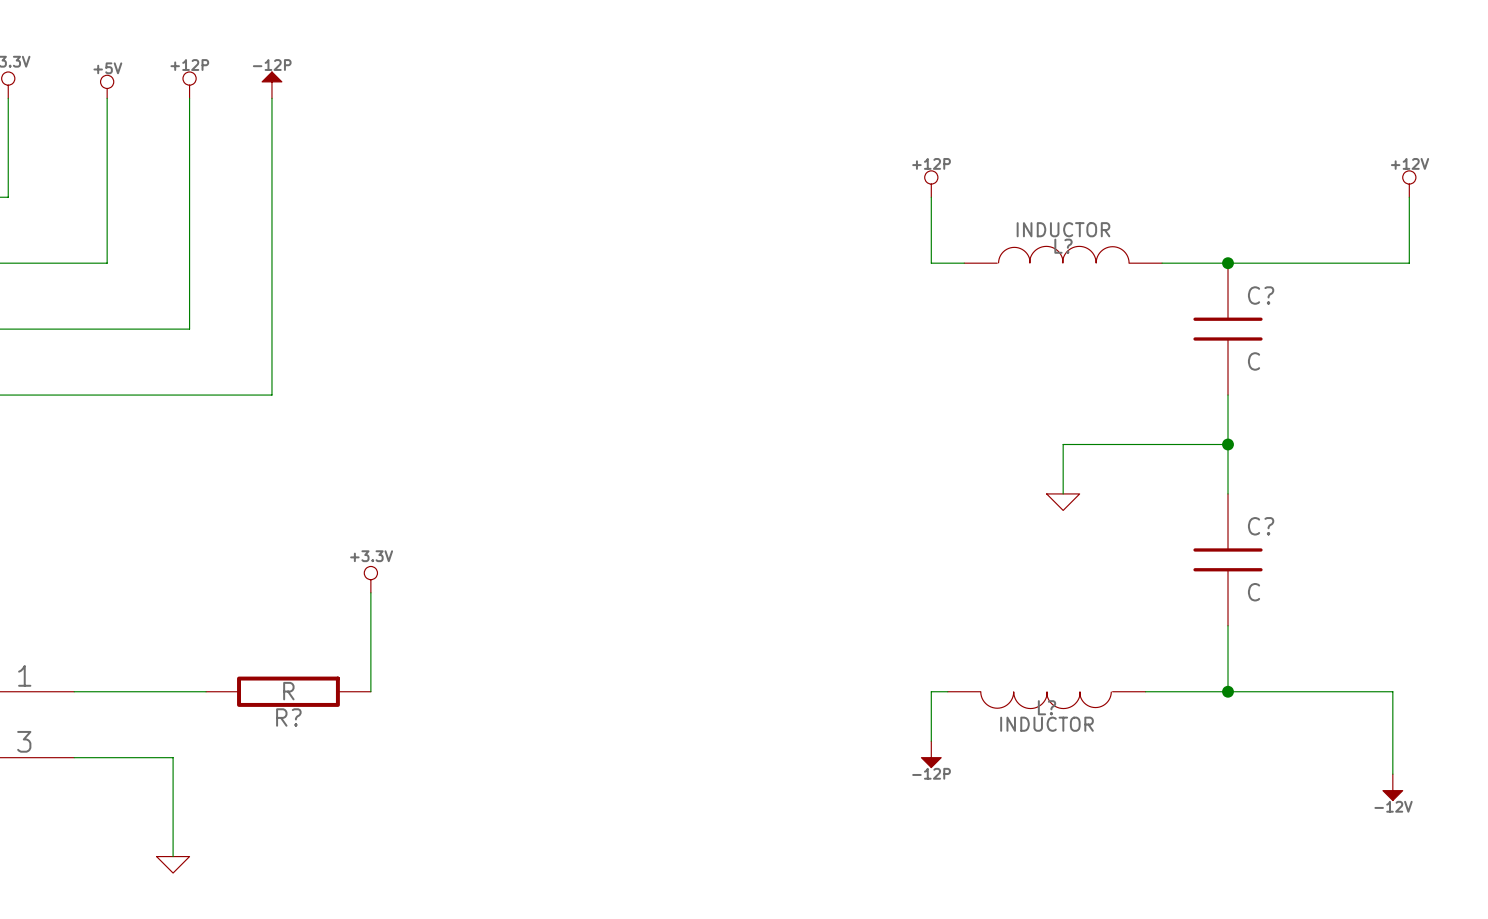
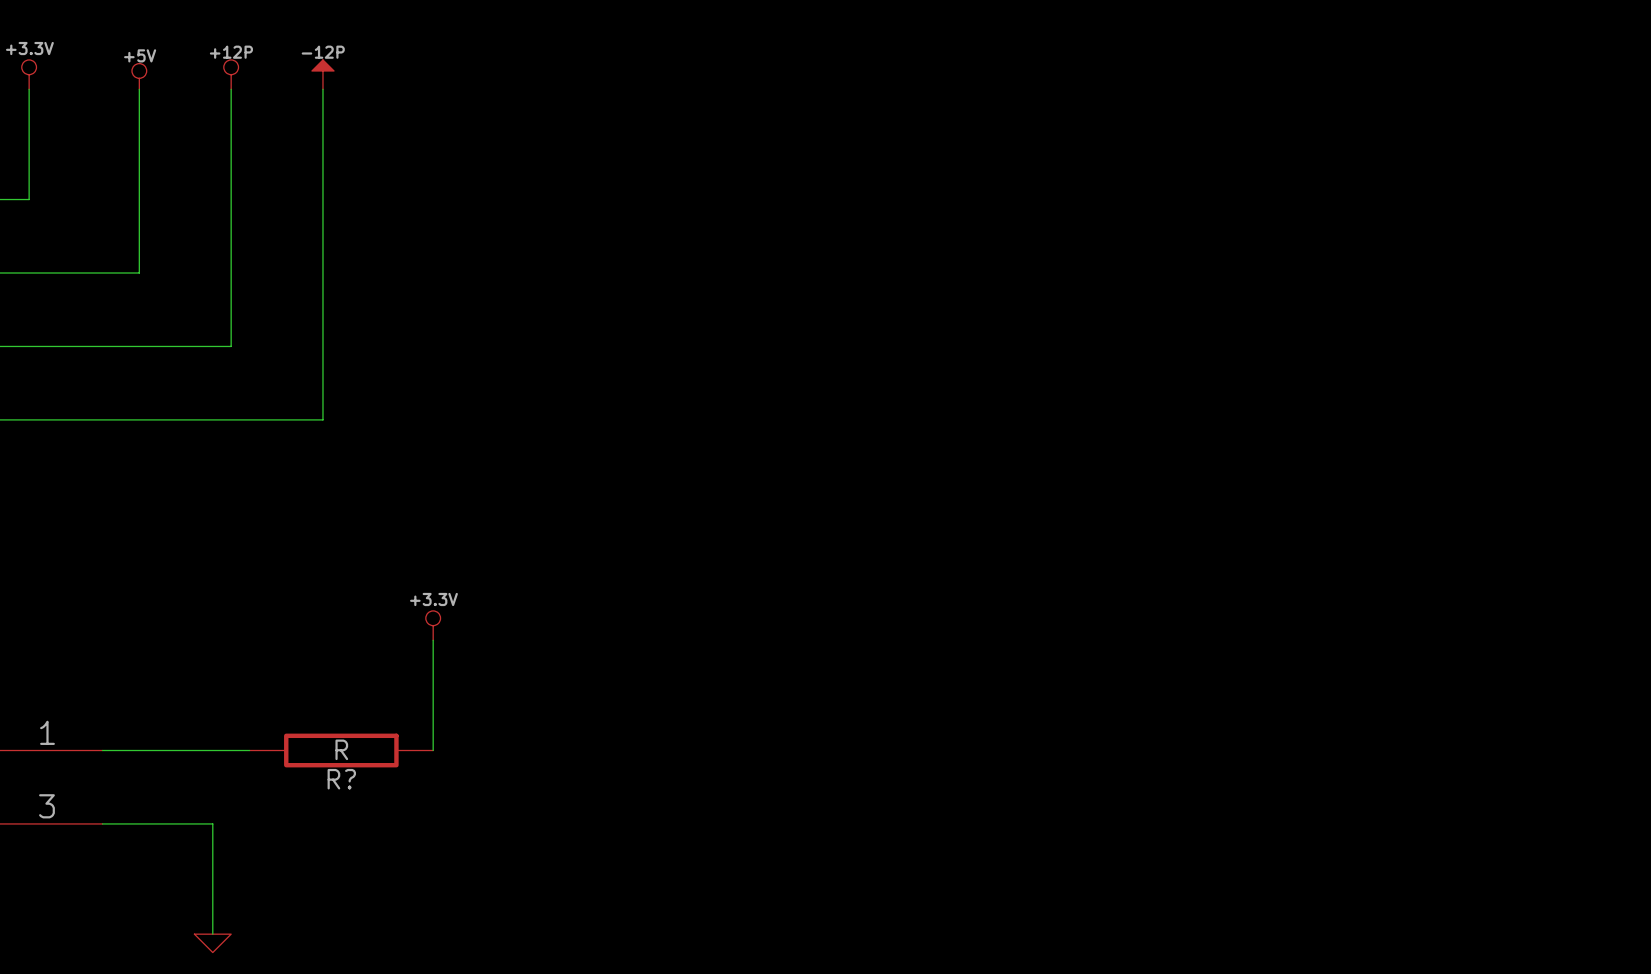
power symbol: +12P (931, 184) -> none
power symbol: +12V (1409, 184) -> none
wire: (931, 197) (931, 263) (964, 263) -> none
wire: (1409, 197) (1409, 263) (1162, 263) -> none
L?: INDUCTOR (1063, 254) -> none
junction: (1228, 263) -> none
C?: C (1228, 329) -> none
wire: (1228, 395) (1228, 493) -> none
wire: (1228, 444) (1063, 444) (1063, 493) -> none
junction: (1228, 444) -> none
power symbol: (1063, 502) -> none
C?: C (1228, 559) -> none
wire: (1228, 625) (1228, 691) -> none
wire: (947, 691) (931, 691) (931, 741) -> none
wire: (1145, 691) (1392, 691) (1392, 774) -> none
junction: (1228, 691) -> none
L?: INDUCTOR (1046, 700) -> none
power symbol: -12P (931, 754) -> none
power symbol: -12V (1392, 787) -> none

